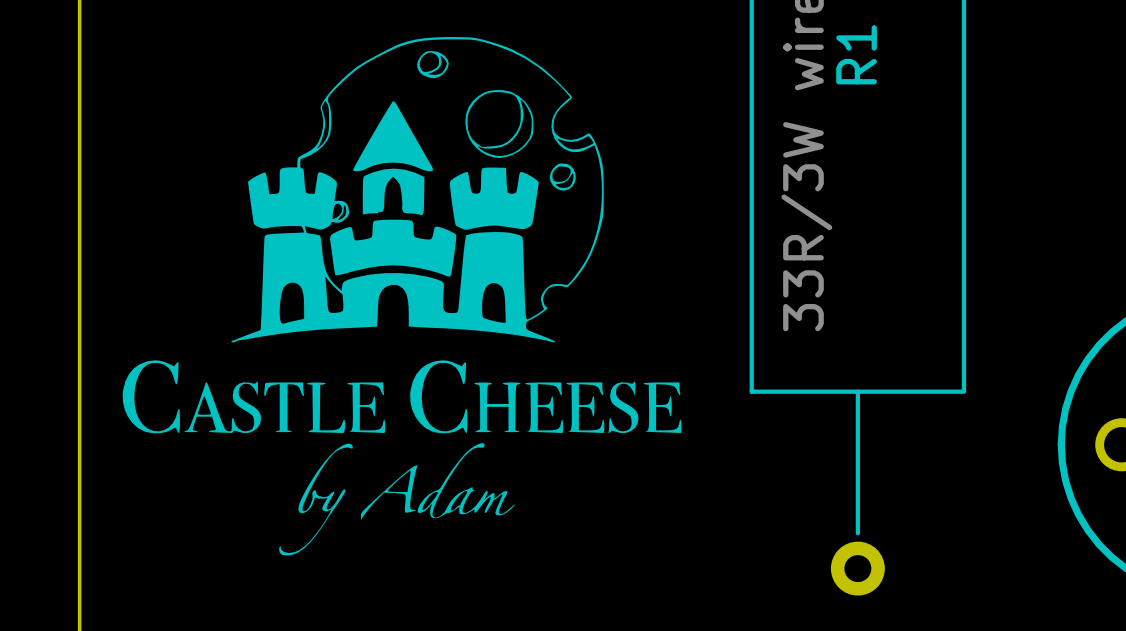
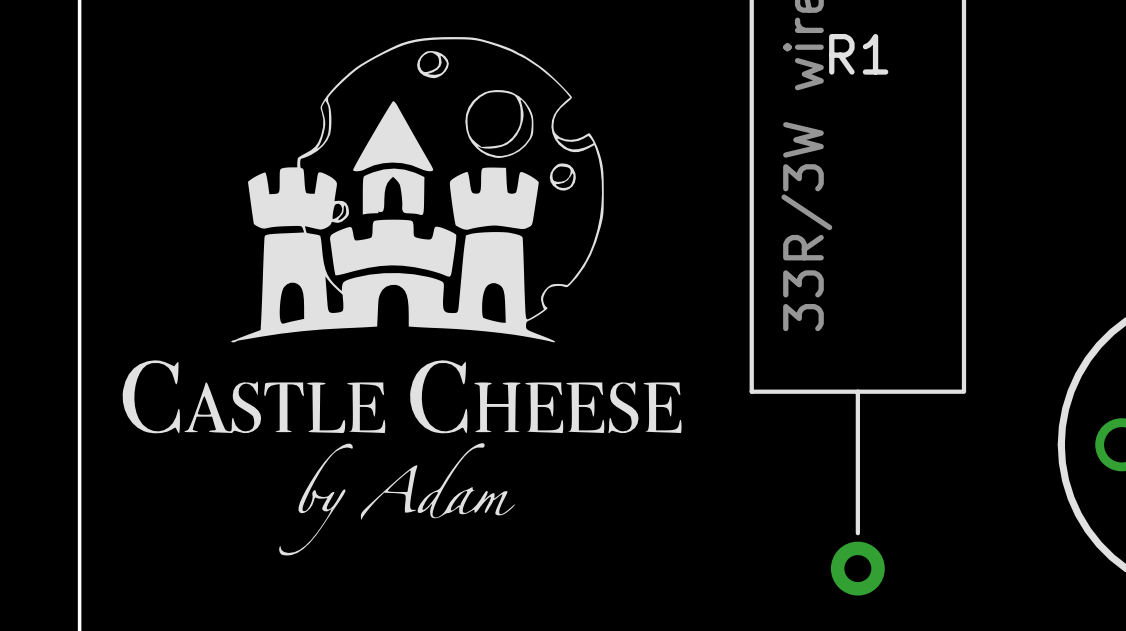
R1 name rotation: 0° (856, 54) -> 90° clockwise (858, 54)

